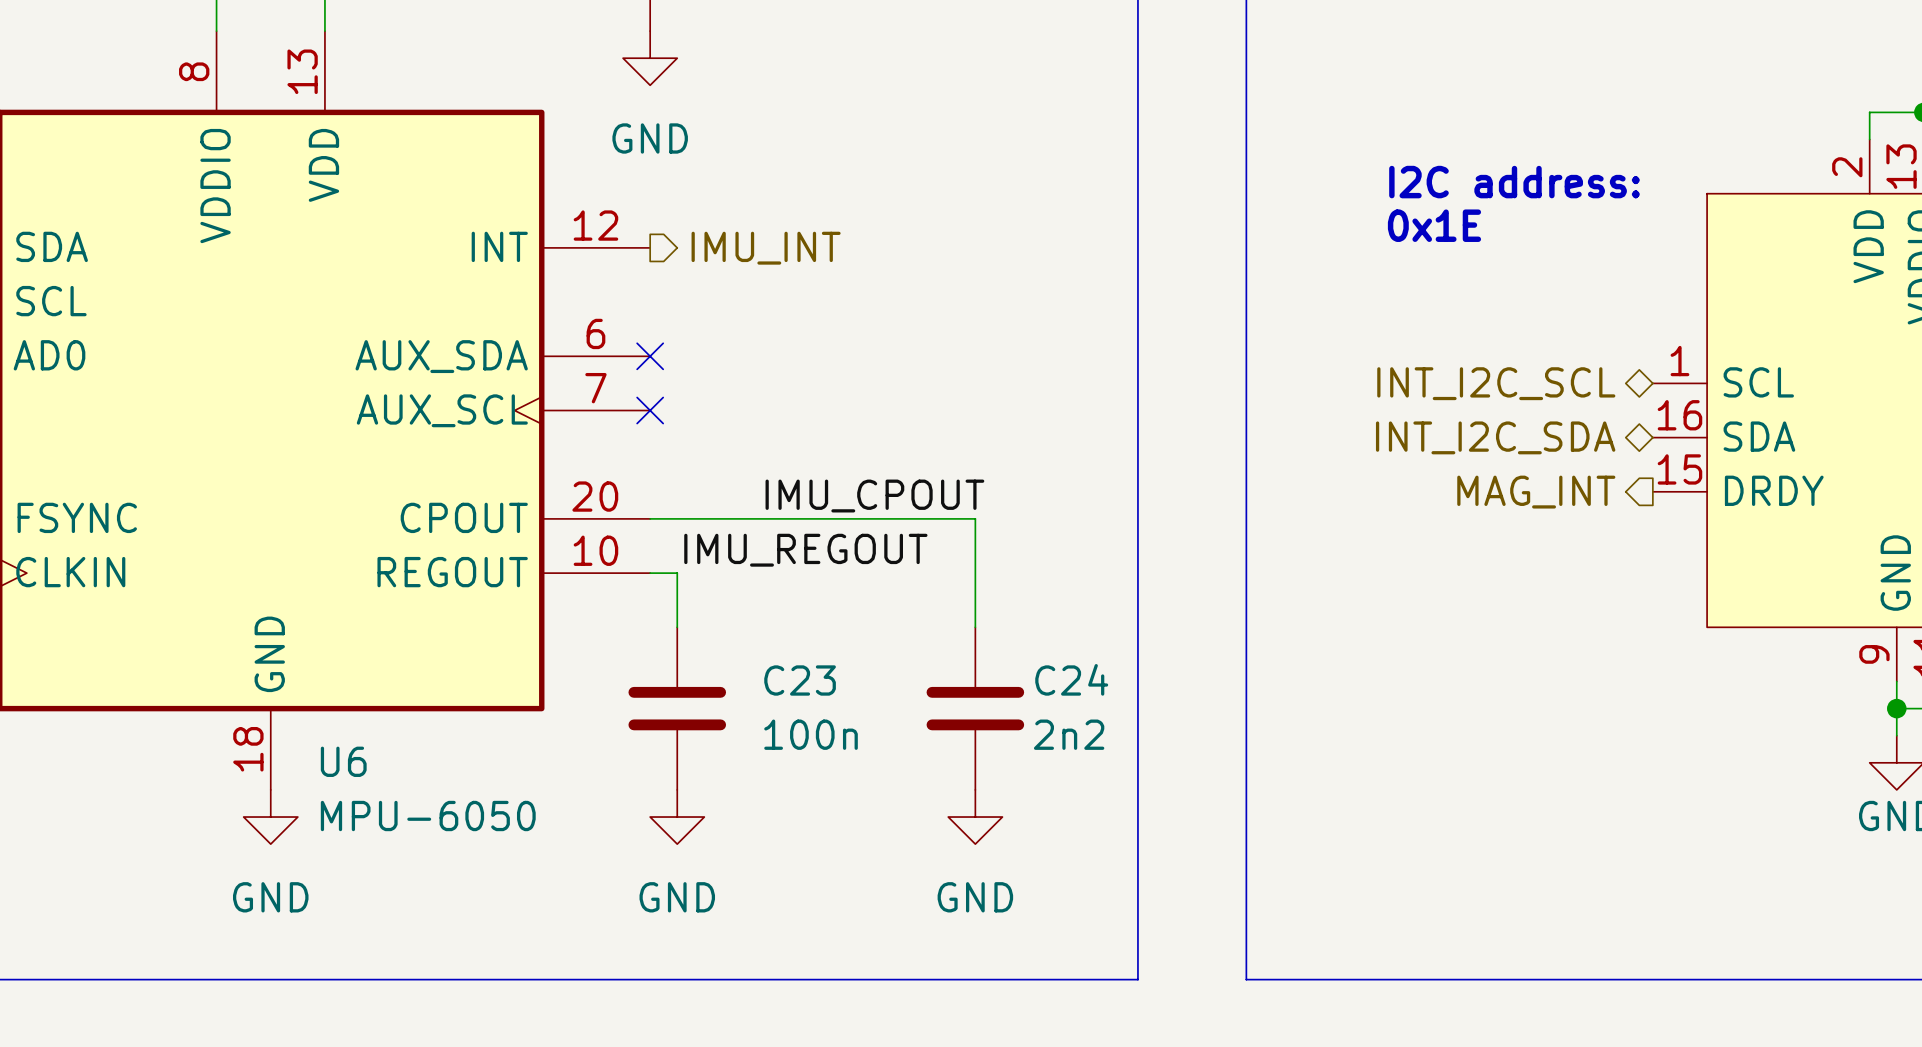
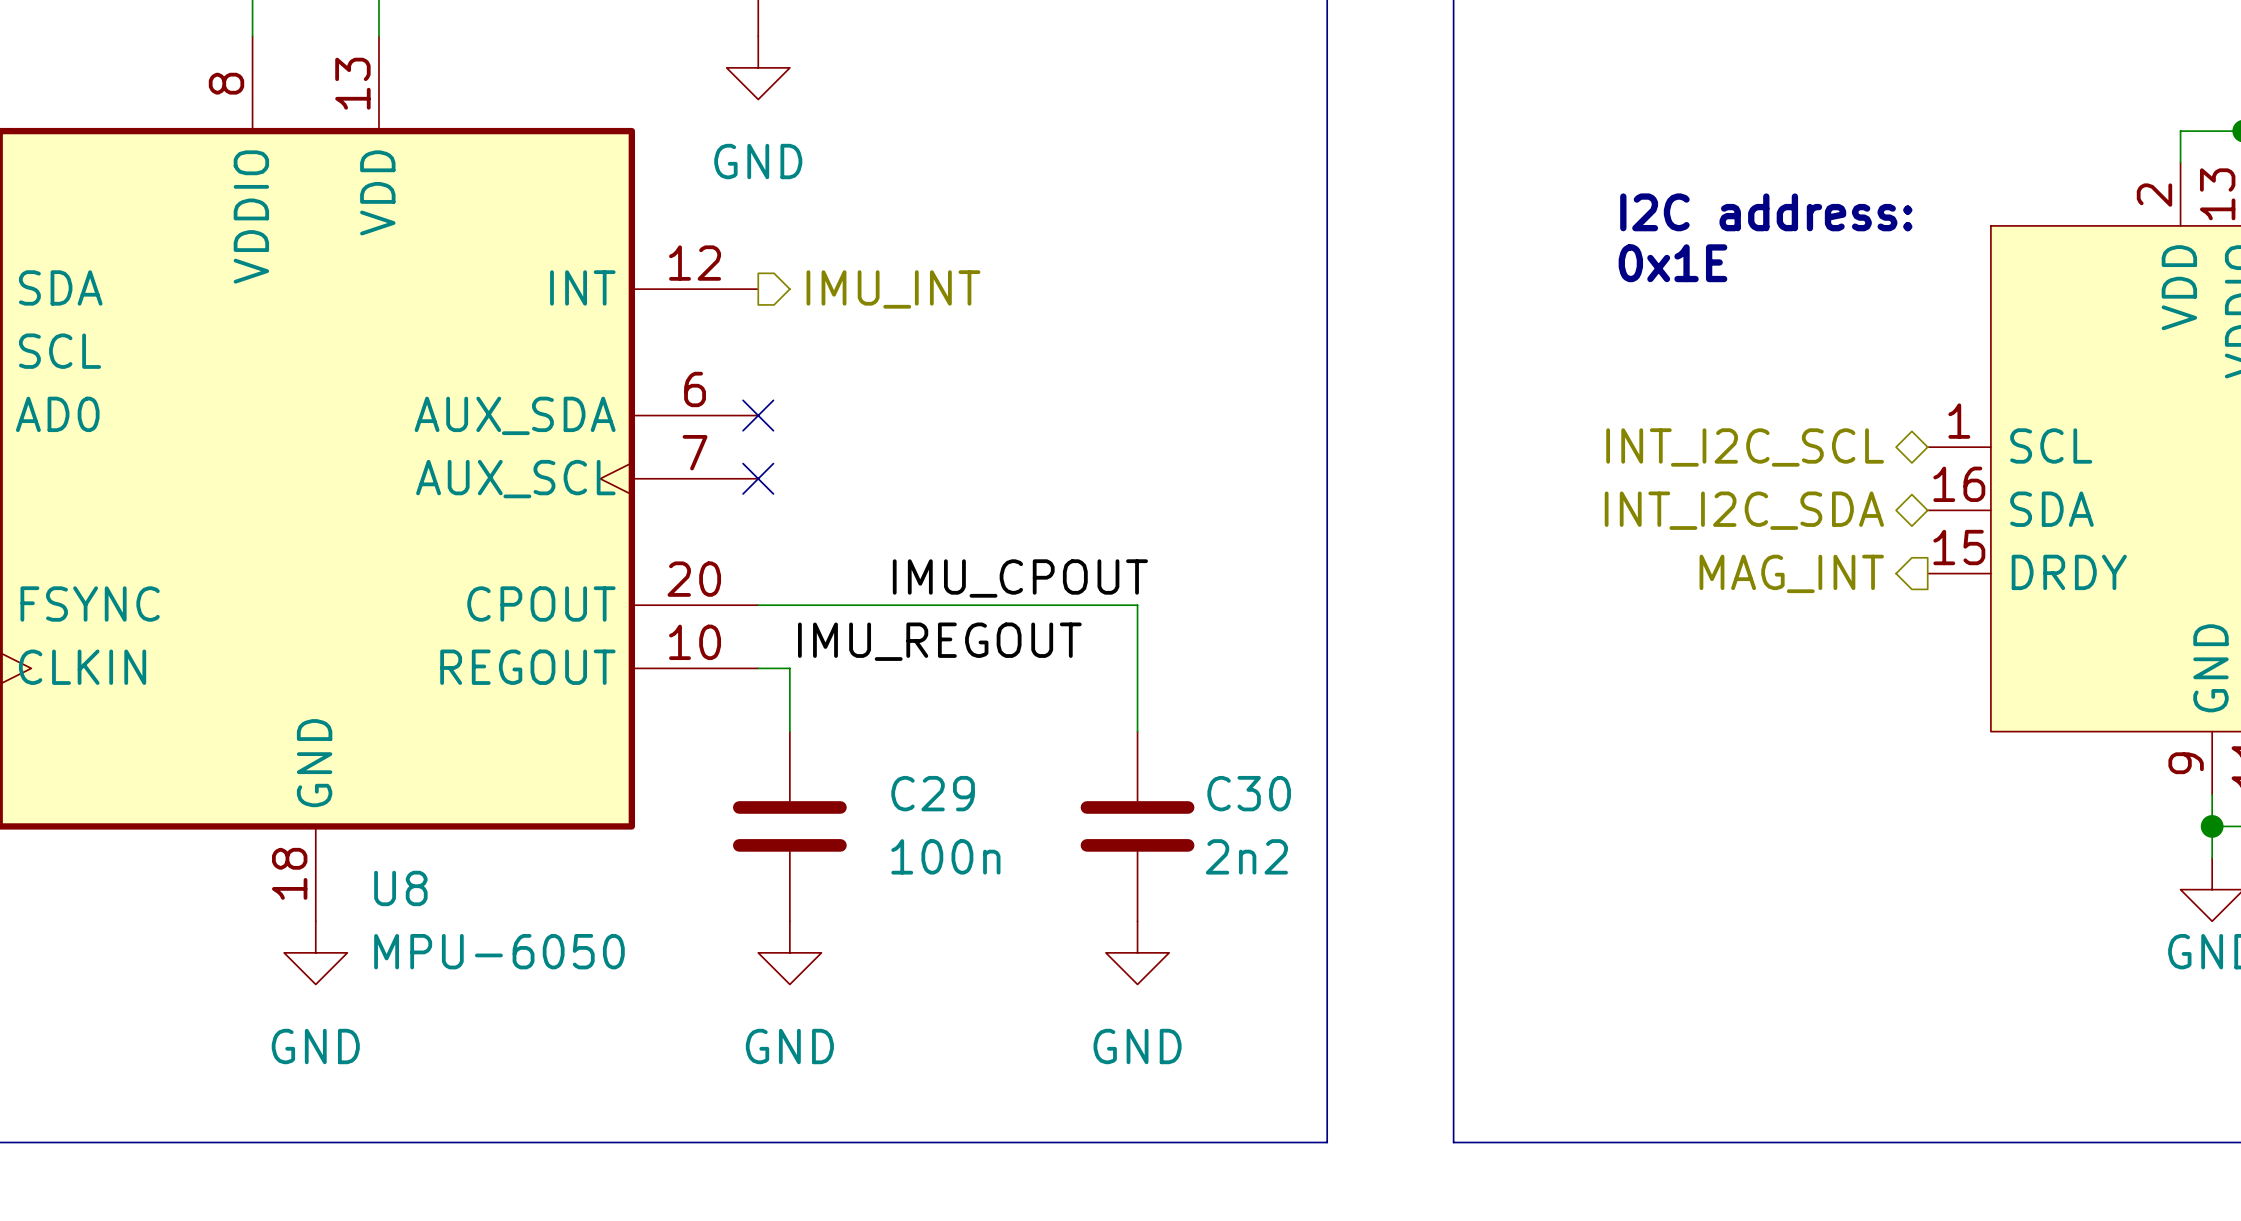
C24 name: C24 (1071, 679) -> C30 (1249, 793)
C23 name: C23 (800, 680) -> C29 (933, 793)
U6 name: U6 (343, 761) -> U8 (400, 888)

